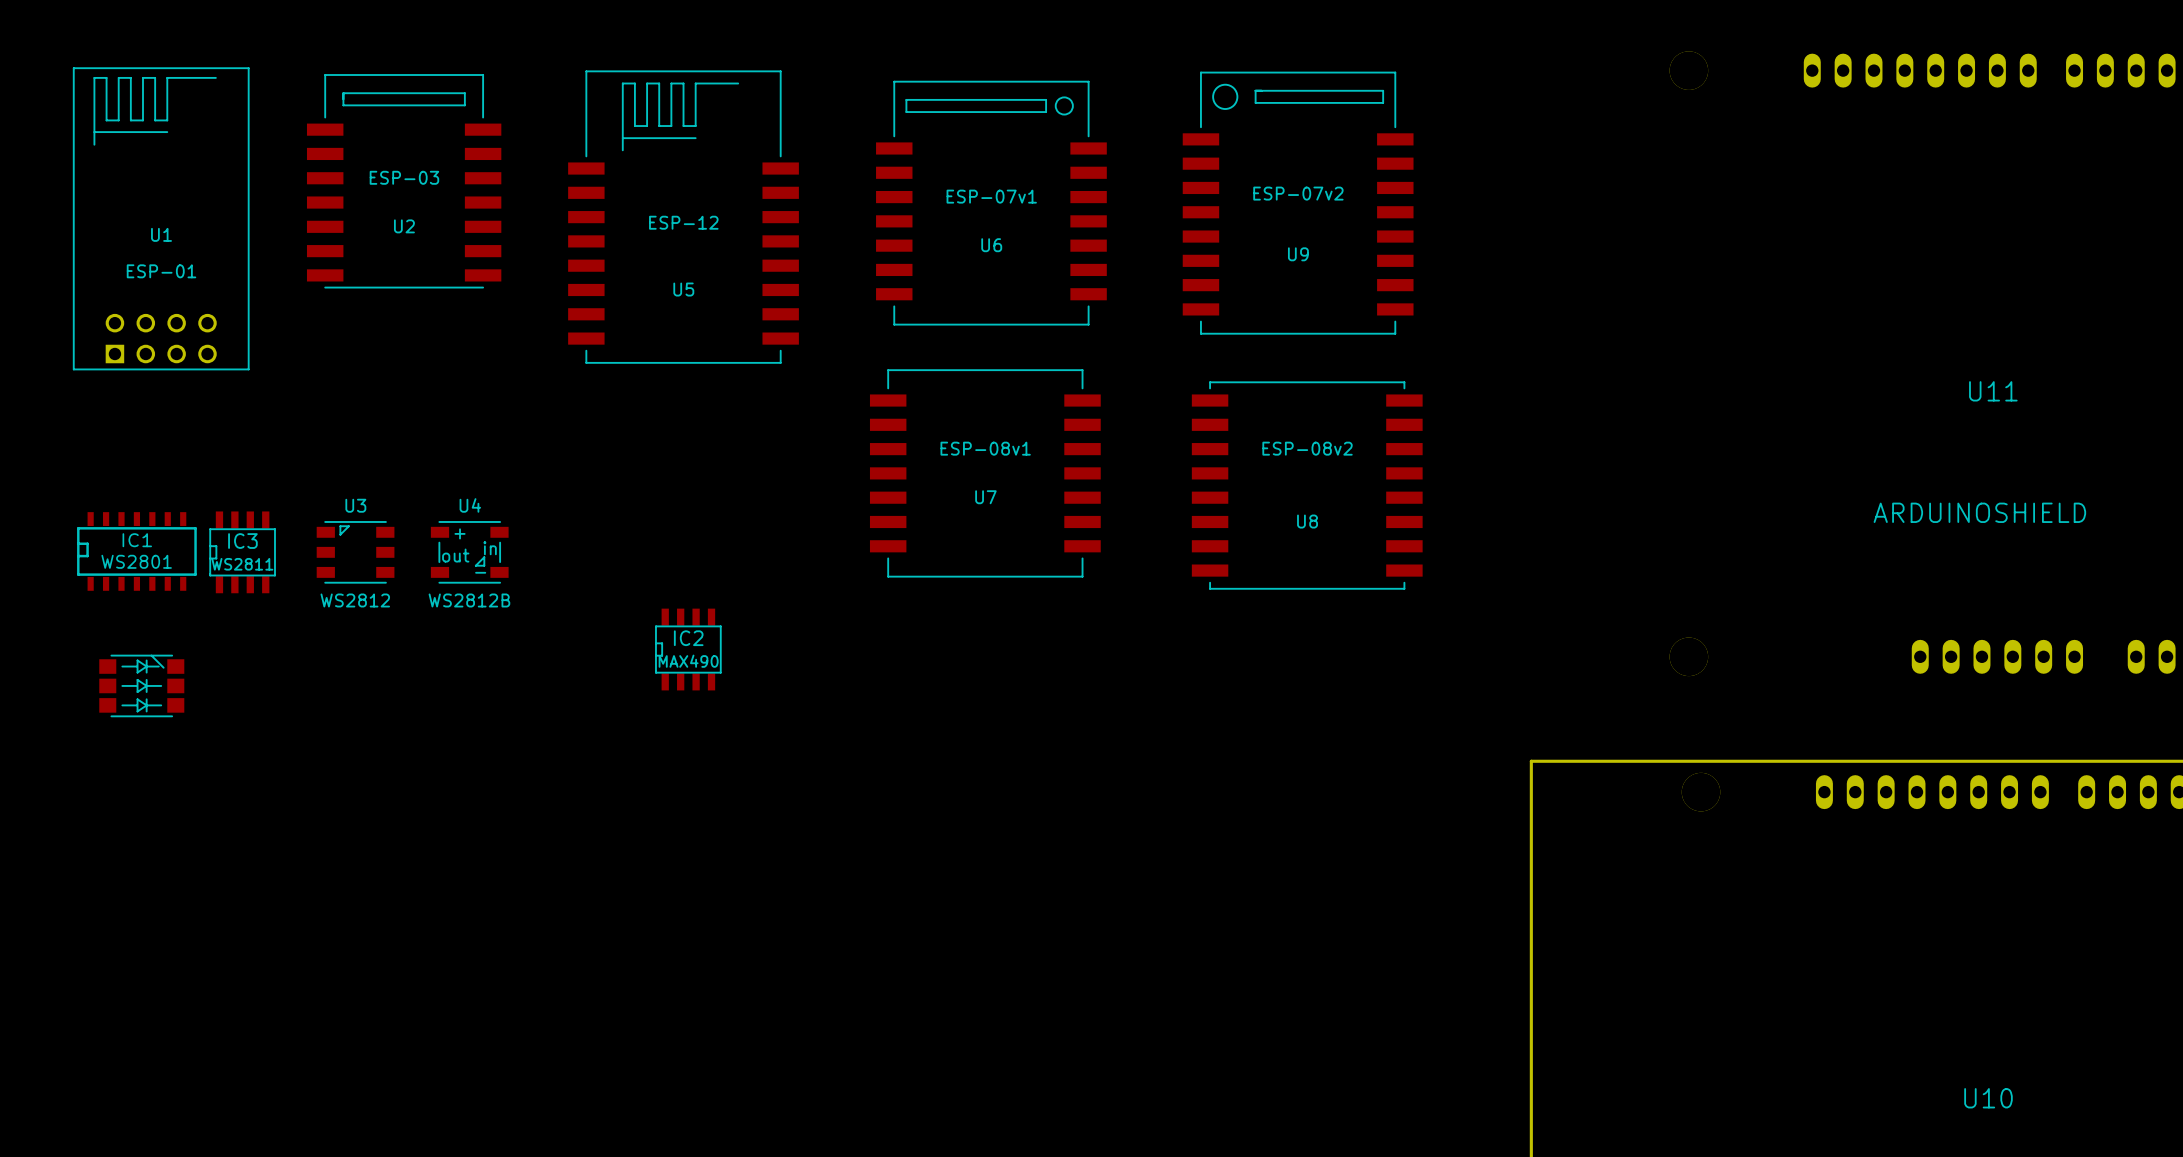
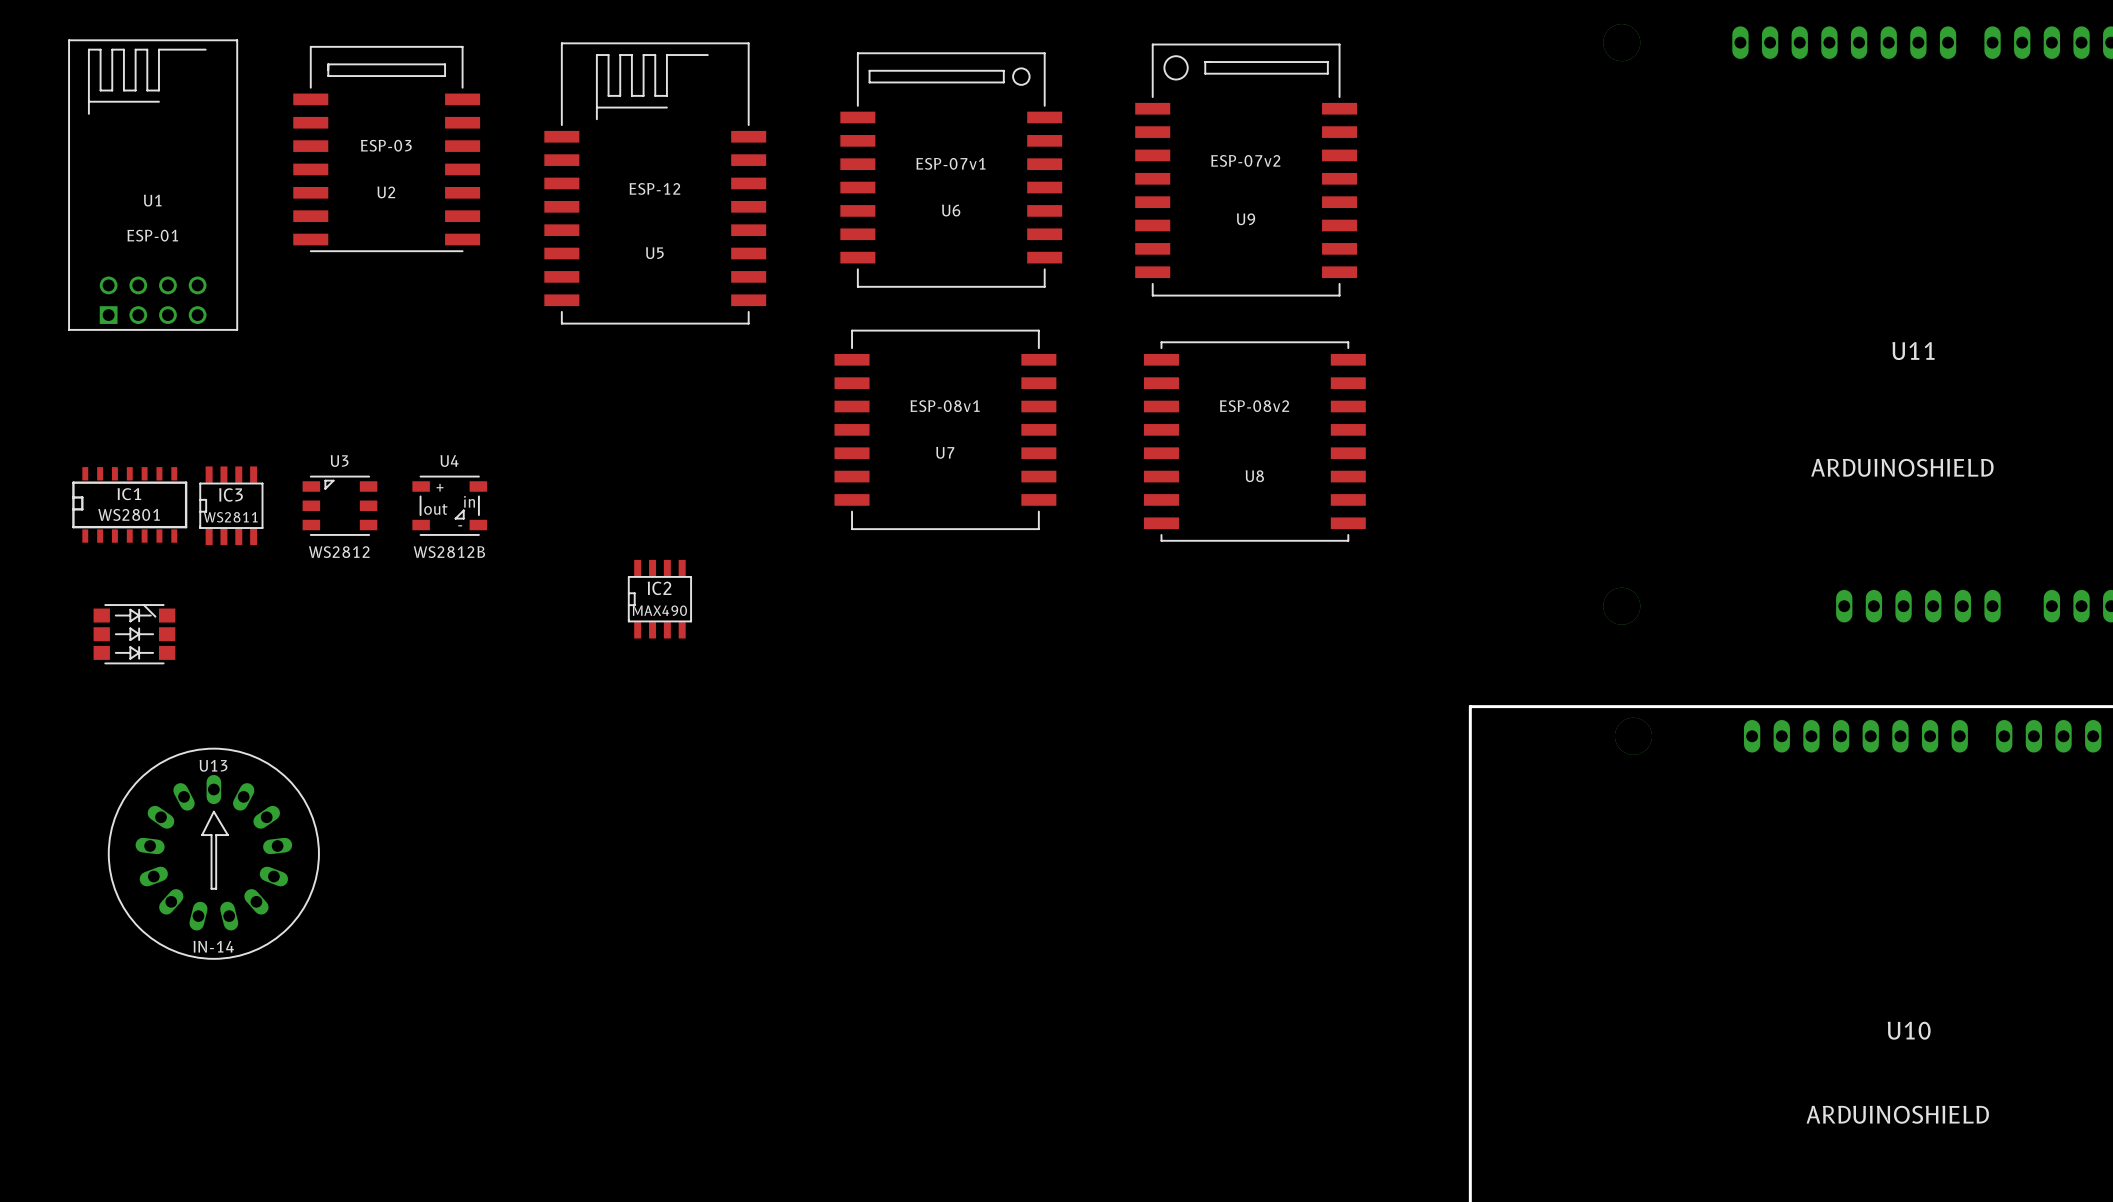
U13: none -> IN-14 (213, 853)

